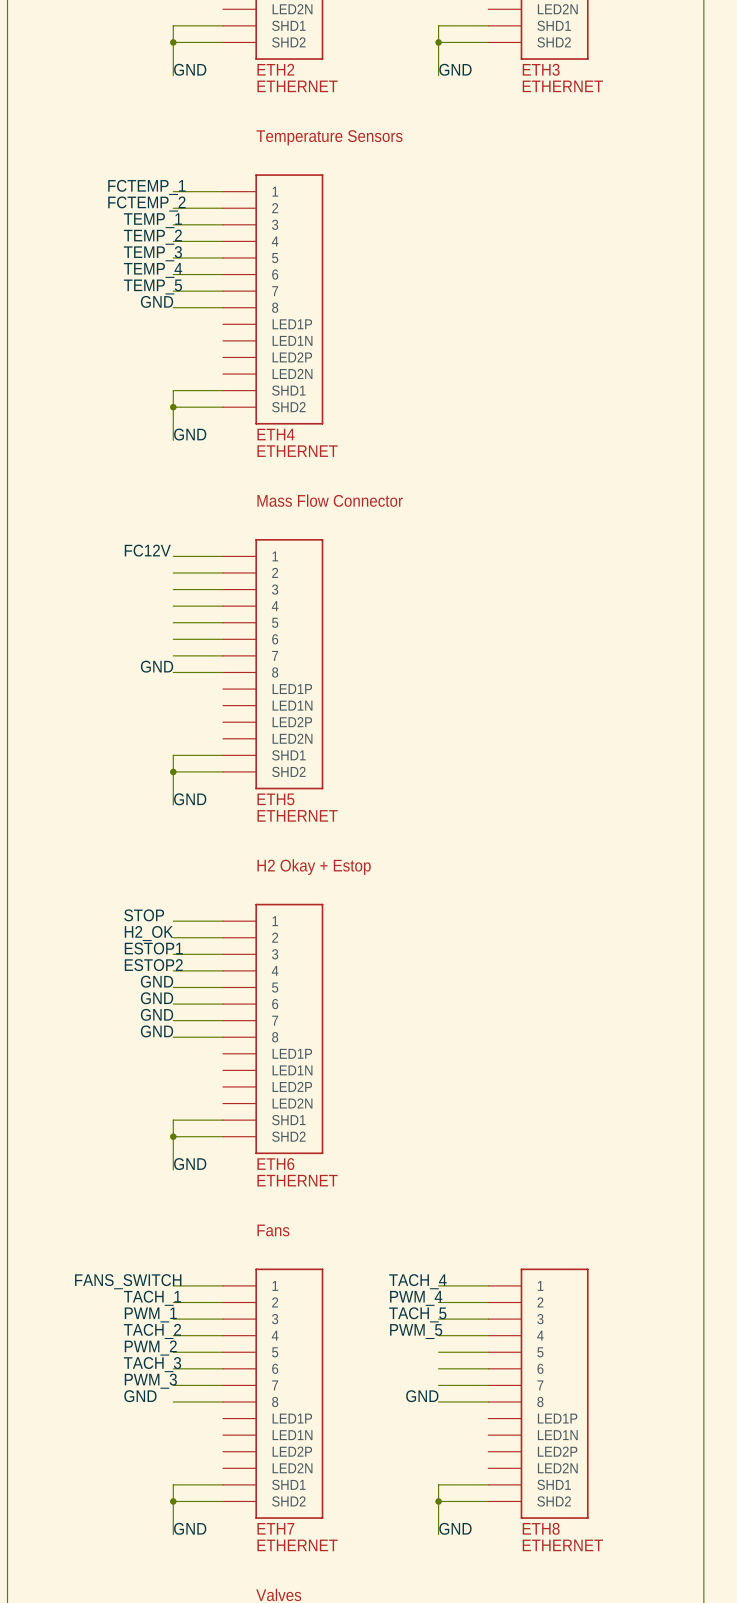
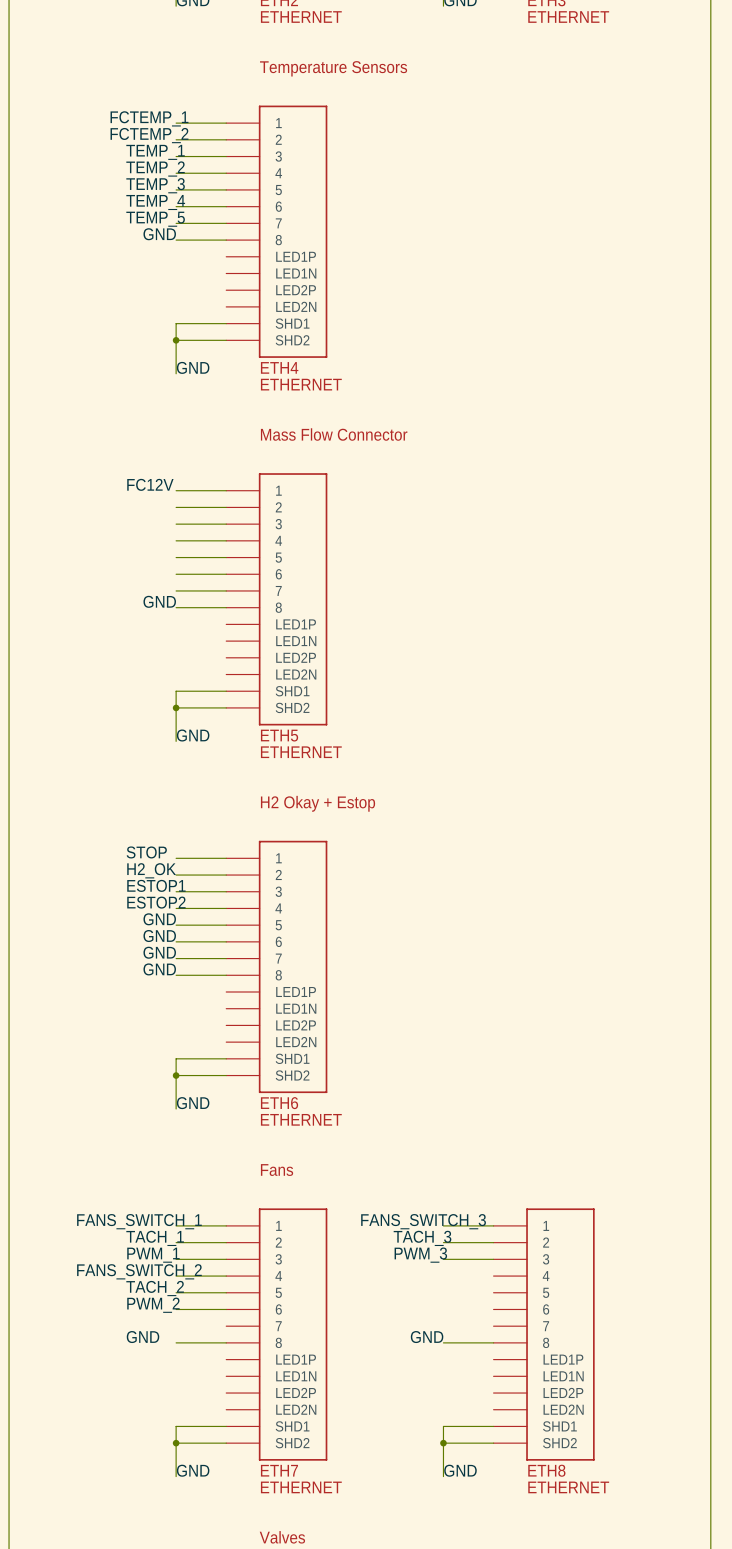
label: FANS_SWITCH (128, 1281) -> FANS_SWITCH_1 (139, 1221)
label: TACH_4 (417, 1281) -> none
label: none -> FANS_SWITCH_3 (423, 1221)
label: PWM_4 (416, 1298) -> TACH_3 (422, 1238)
label: TACH_5 (417, 1314) -> PWM_3 (420, 1255)
label: none -> FANS_SWITCH_2 (139, 1271)
label: TACH_2 (152, 1331) -> none
label: PWM_5 (416, 1331) -> none
wire: (438, 1335) (488, 1335) -> none
label: PWM_2 (150, 1348) -> TACH_2 (155, 1288)
wire: (438, 1352) (488, 1352) -> none
label: TACH_3 (152, 1364) -> PWM_2 (153, 1305)
wire: (438, 1368) (488, 1368) -> none
label: PWM_3 (150, 1381) -> none
wire: (173, 1385) (223, 1385) -> none
wire: (438, 1385) (488, 1385) -> none

